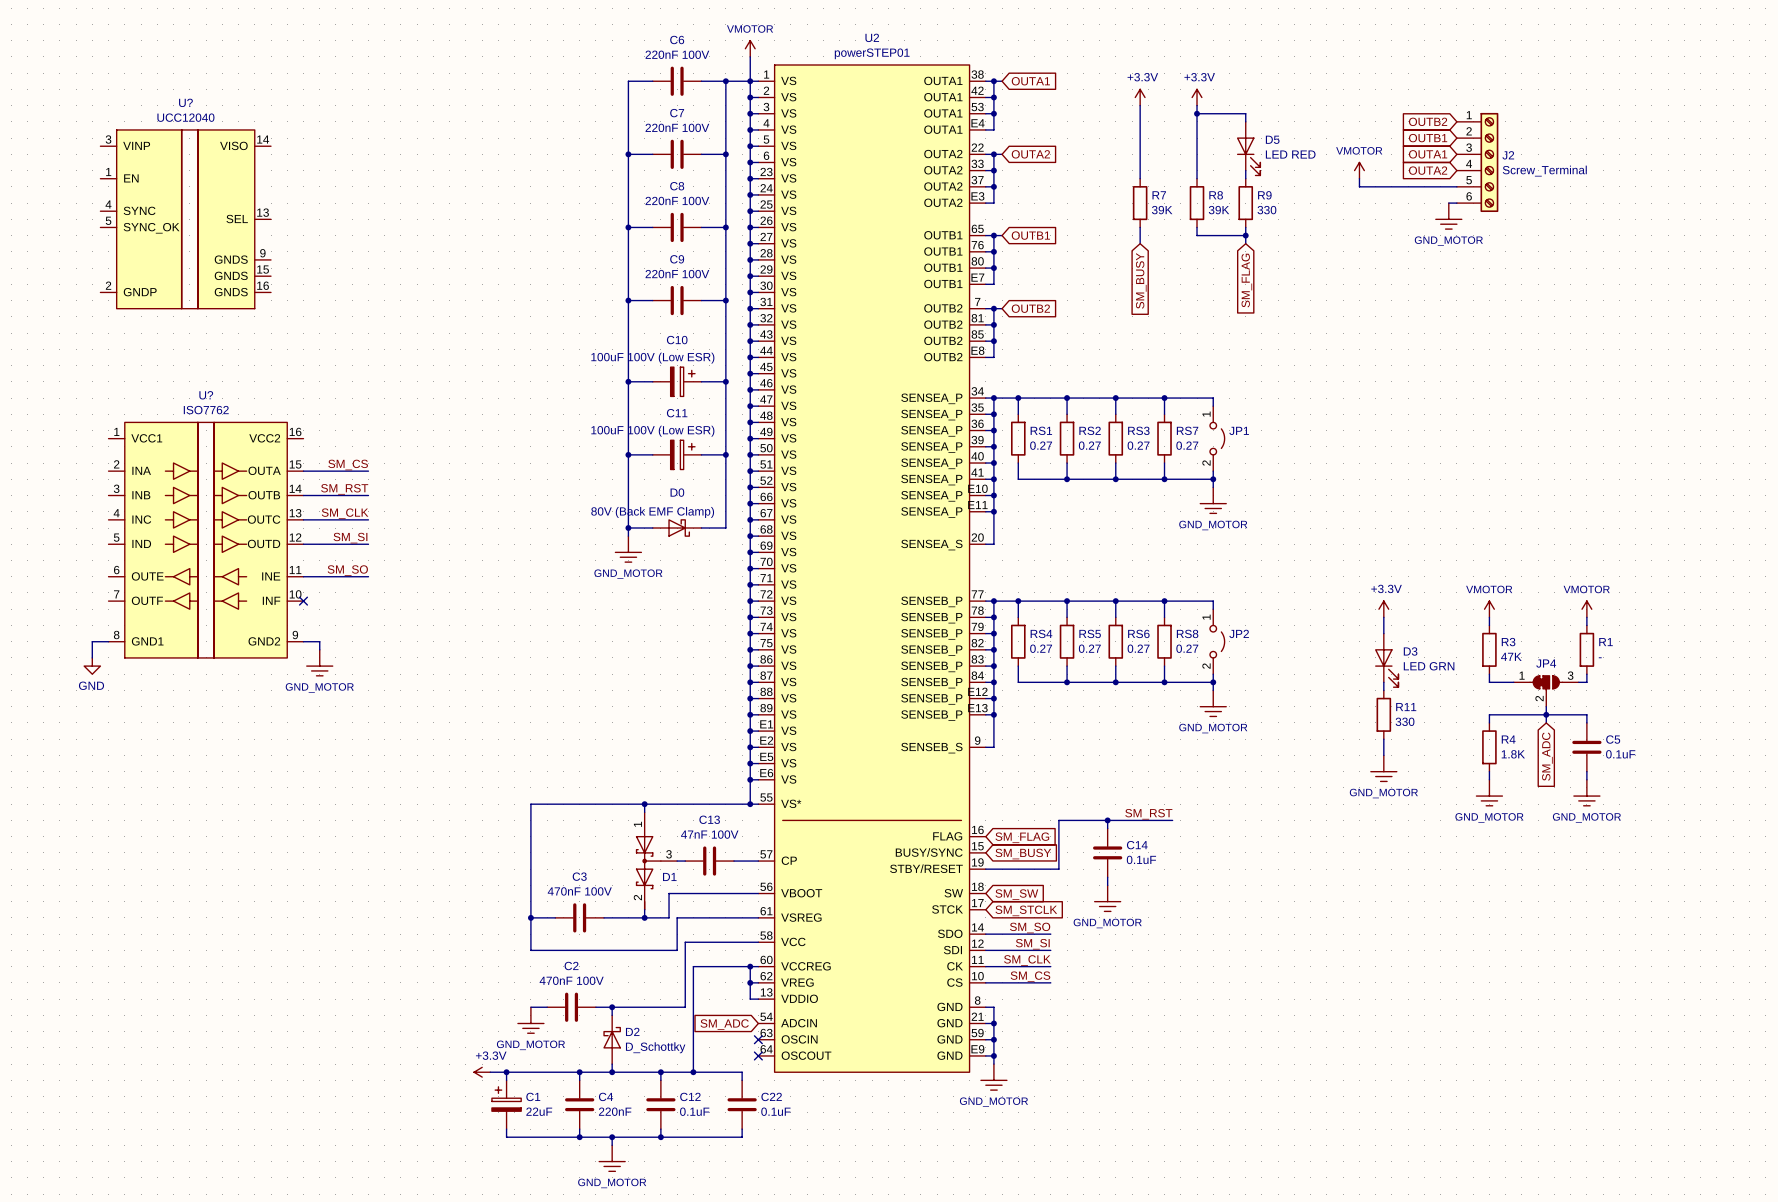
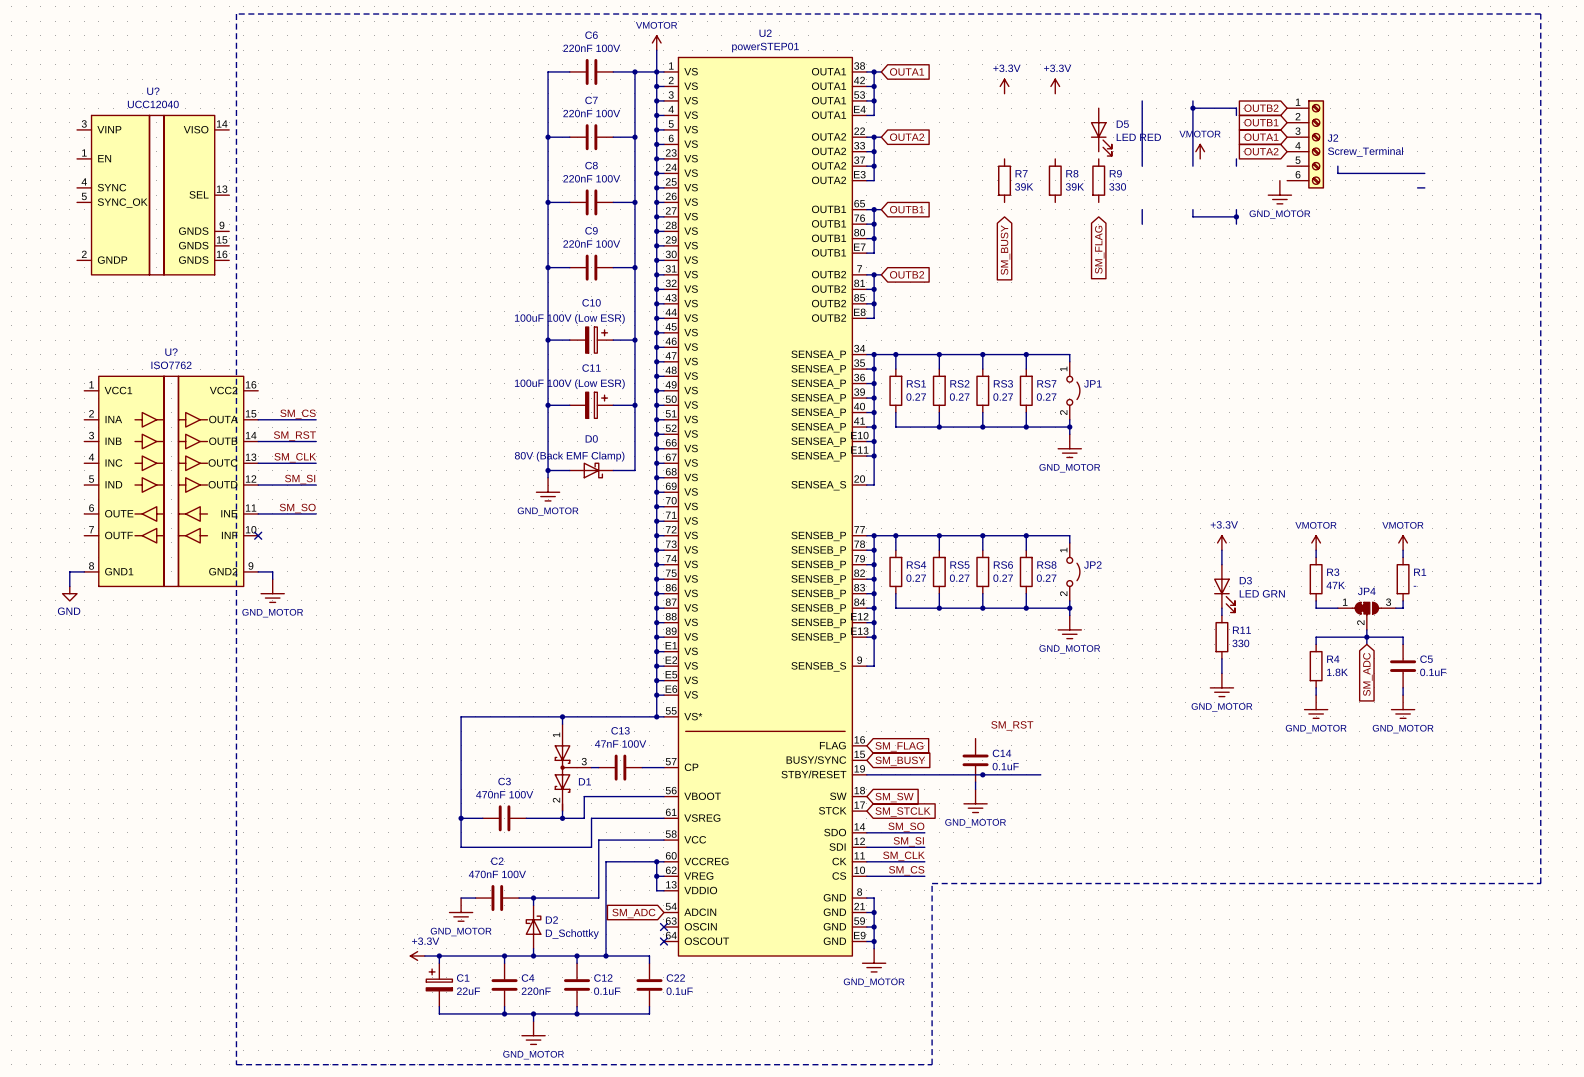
line: none -> (236, 14) (1540, 14) (1540, 883) (932, 883) (932, 1064) (236, 1064) (236, 14)
wire: (1140, 105) (1140, 178) -> (1142, 100) (1142, 166)
wire: (1197, 105) (1197, 178) -> (1192, 100) (1192, 166)
wire: (1197, 113) (1245, 113) (1245, 121) -> (1192, 108) (1236, 108) (1236, 115)
junction: (1197, 113) -> none
junction: none -> (1192, 108)
wire: (1245, 170) (1245, 178) -> (1236, 158) (1236, 166)
wire: (1359, 178) (1359, 186) (1456, 186) -> (1337, 166) (1337, 173) (1424, 173)
wire: (1448, 203) (1456, 203) -> (1417, 187) (1424, 187)
wire: (1140, 227) (1140, 243) -> (1142, 209) (1142, 224)
wire: (1197, 227) (1197, 235) (1245, 235) -> (1192, 209) (1192, 216) (1236, 216)
wire: (1245, 227) (1245, 243) -> (1236, 209) (1236, 224)
junction: (1245, 235) -> none
junction: none -> (1236, 216)
wire: (1107, 820) (1107, 828) -> none
junction: (1107, 820) -> none
wire: (1172, 820) (1058, 820) (1058, 869) -> (1040, 774) (932, 774)
junction: none -> (982, 774)

